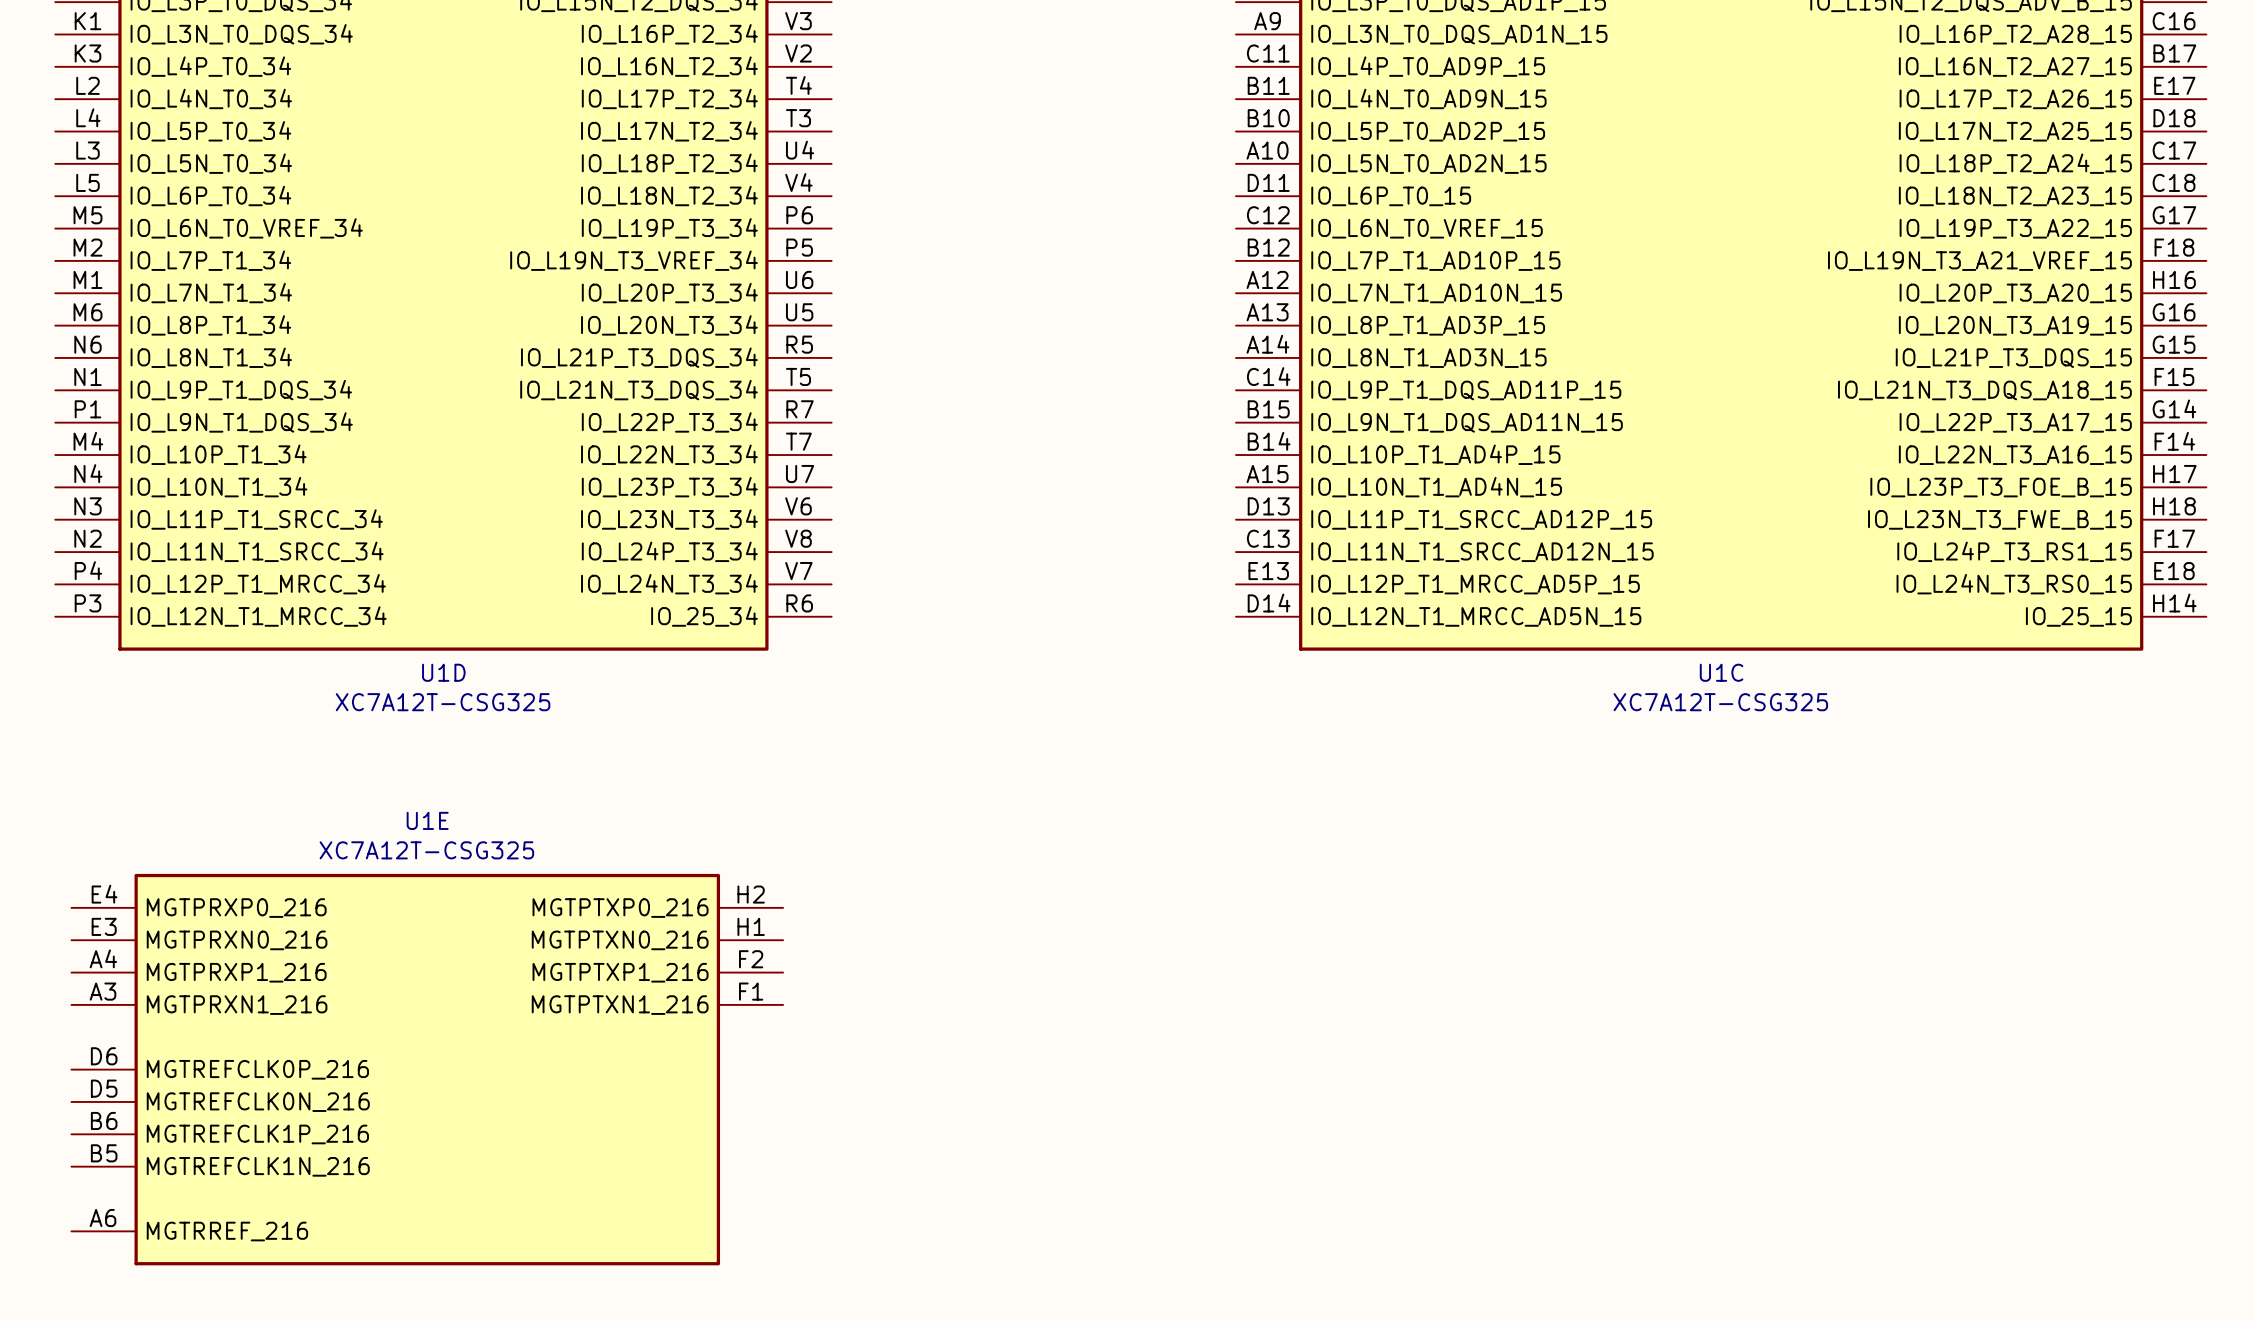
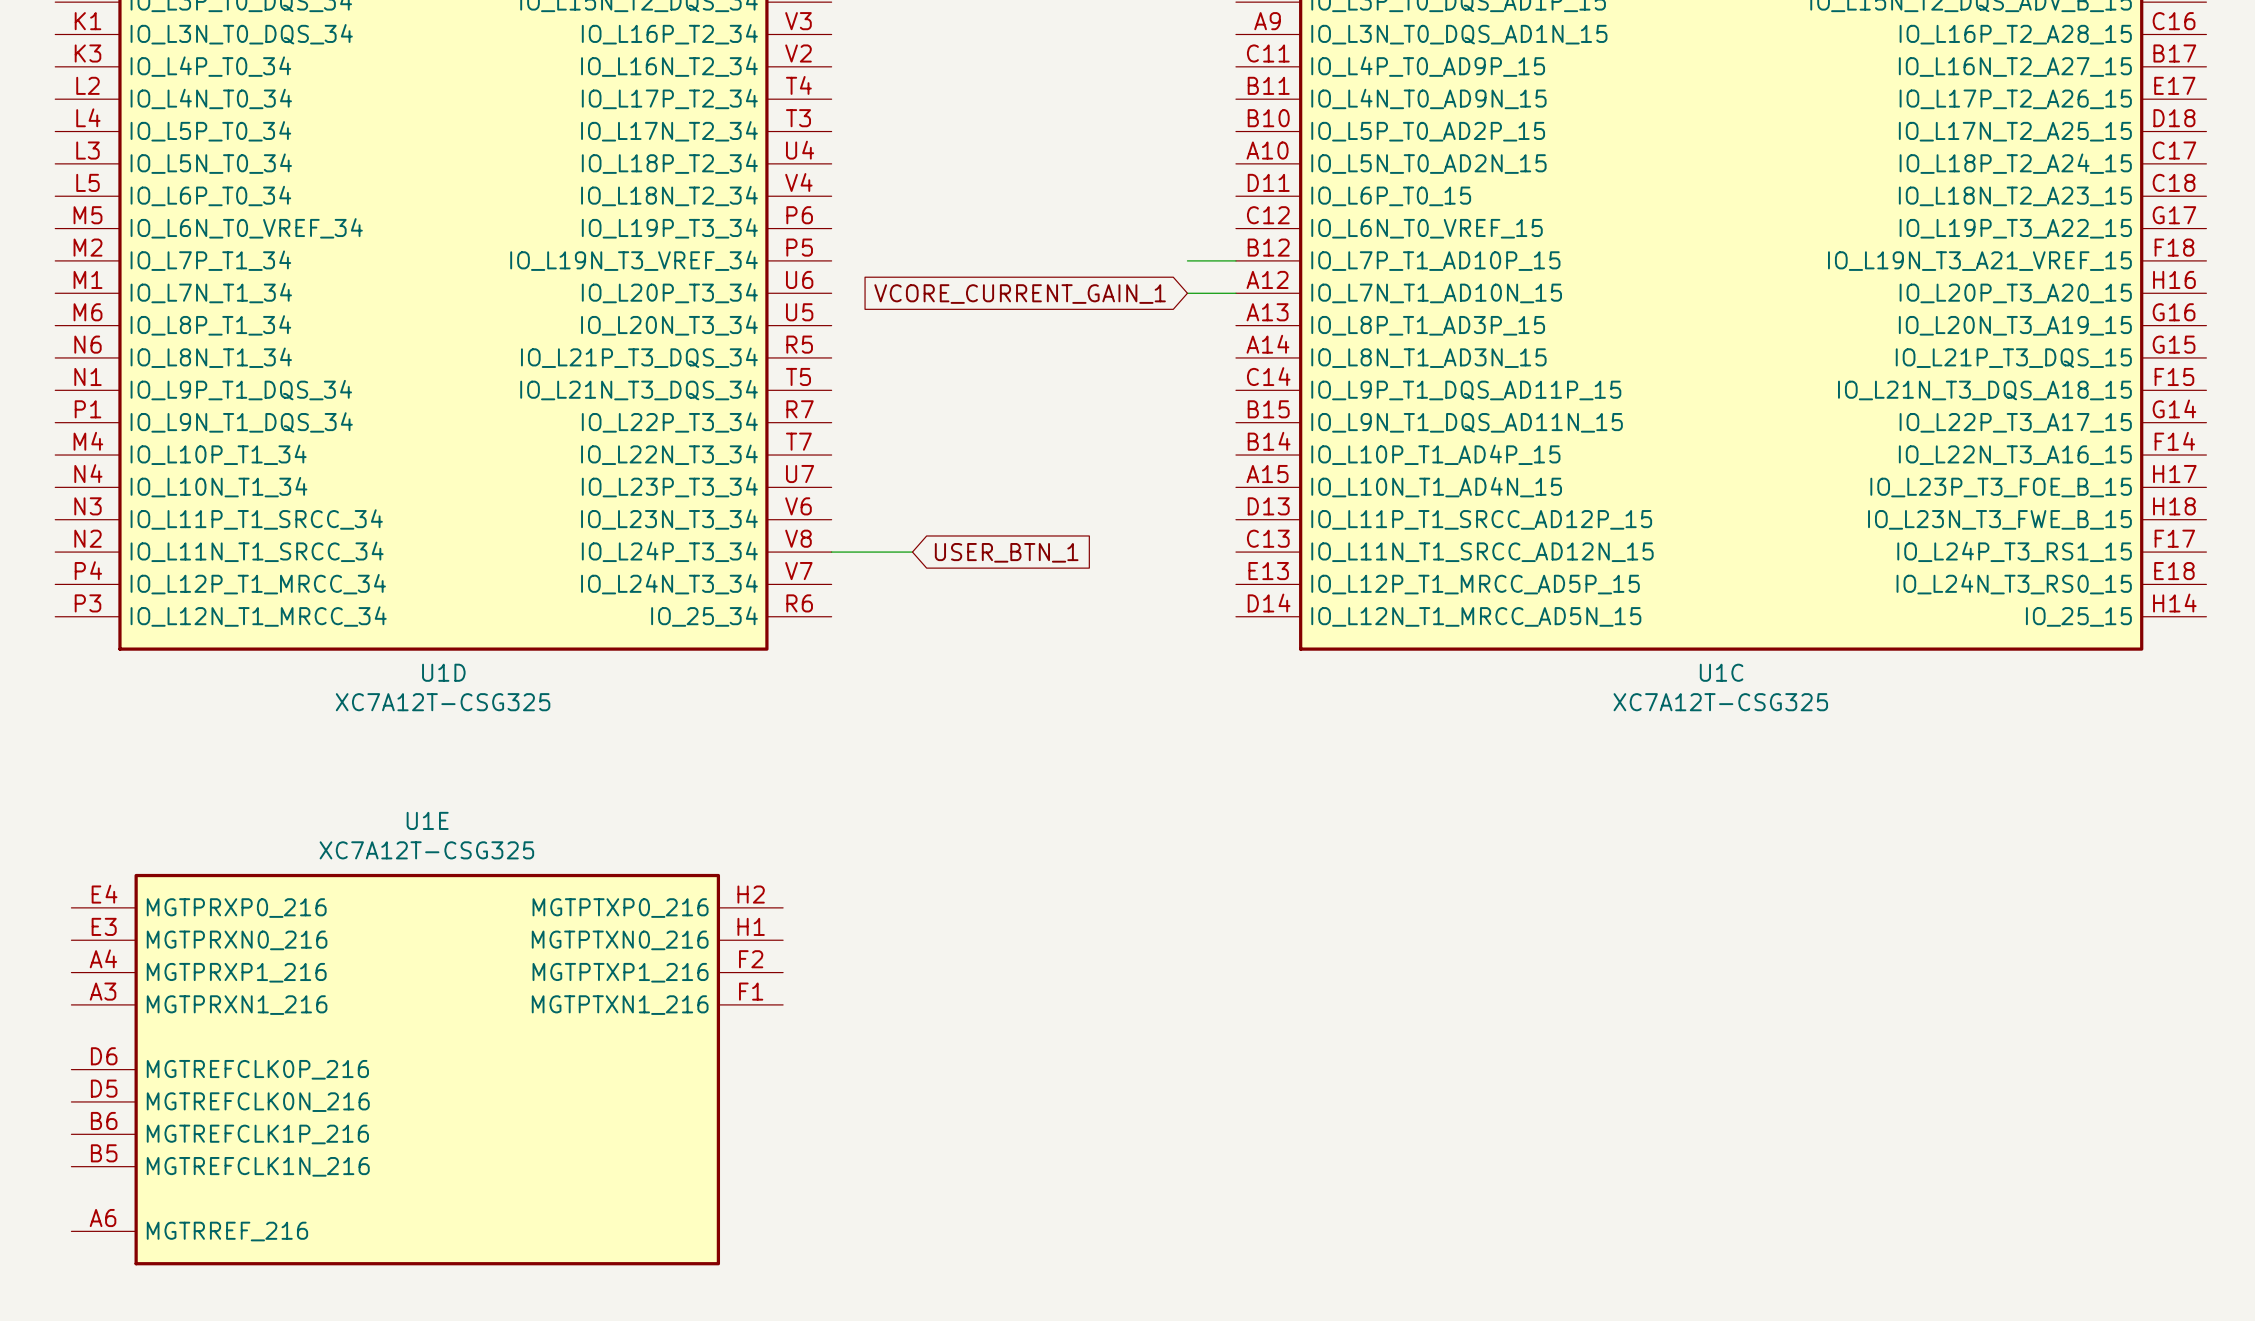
wire: none -> (1187, 260) (1235, 260)
wire: none -> (1187, 293) (1235, 293)
global label: none -> VCORE_CURRENT_GAIN_1 (1020, 294)
wire: none -> (831, 552) (912, 552)
global label: none -> USER_BTN_1 (1006, 552)

